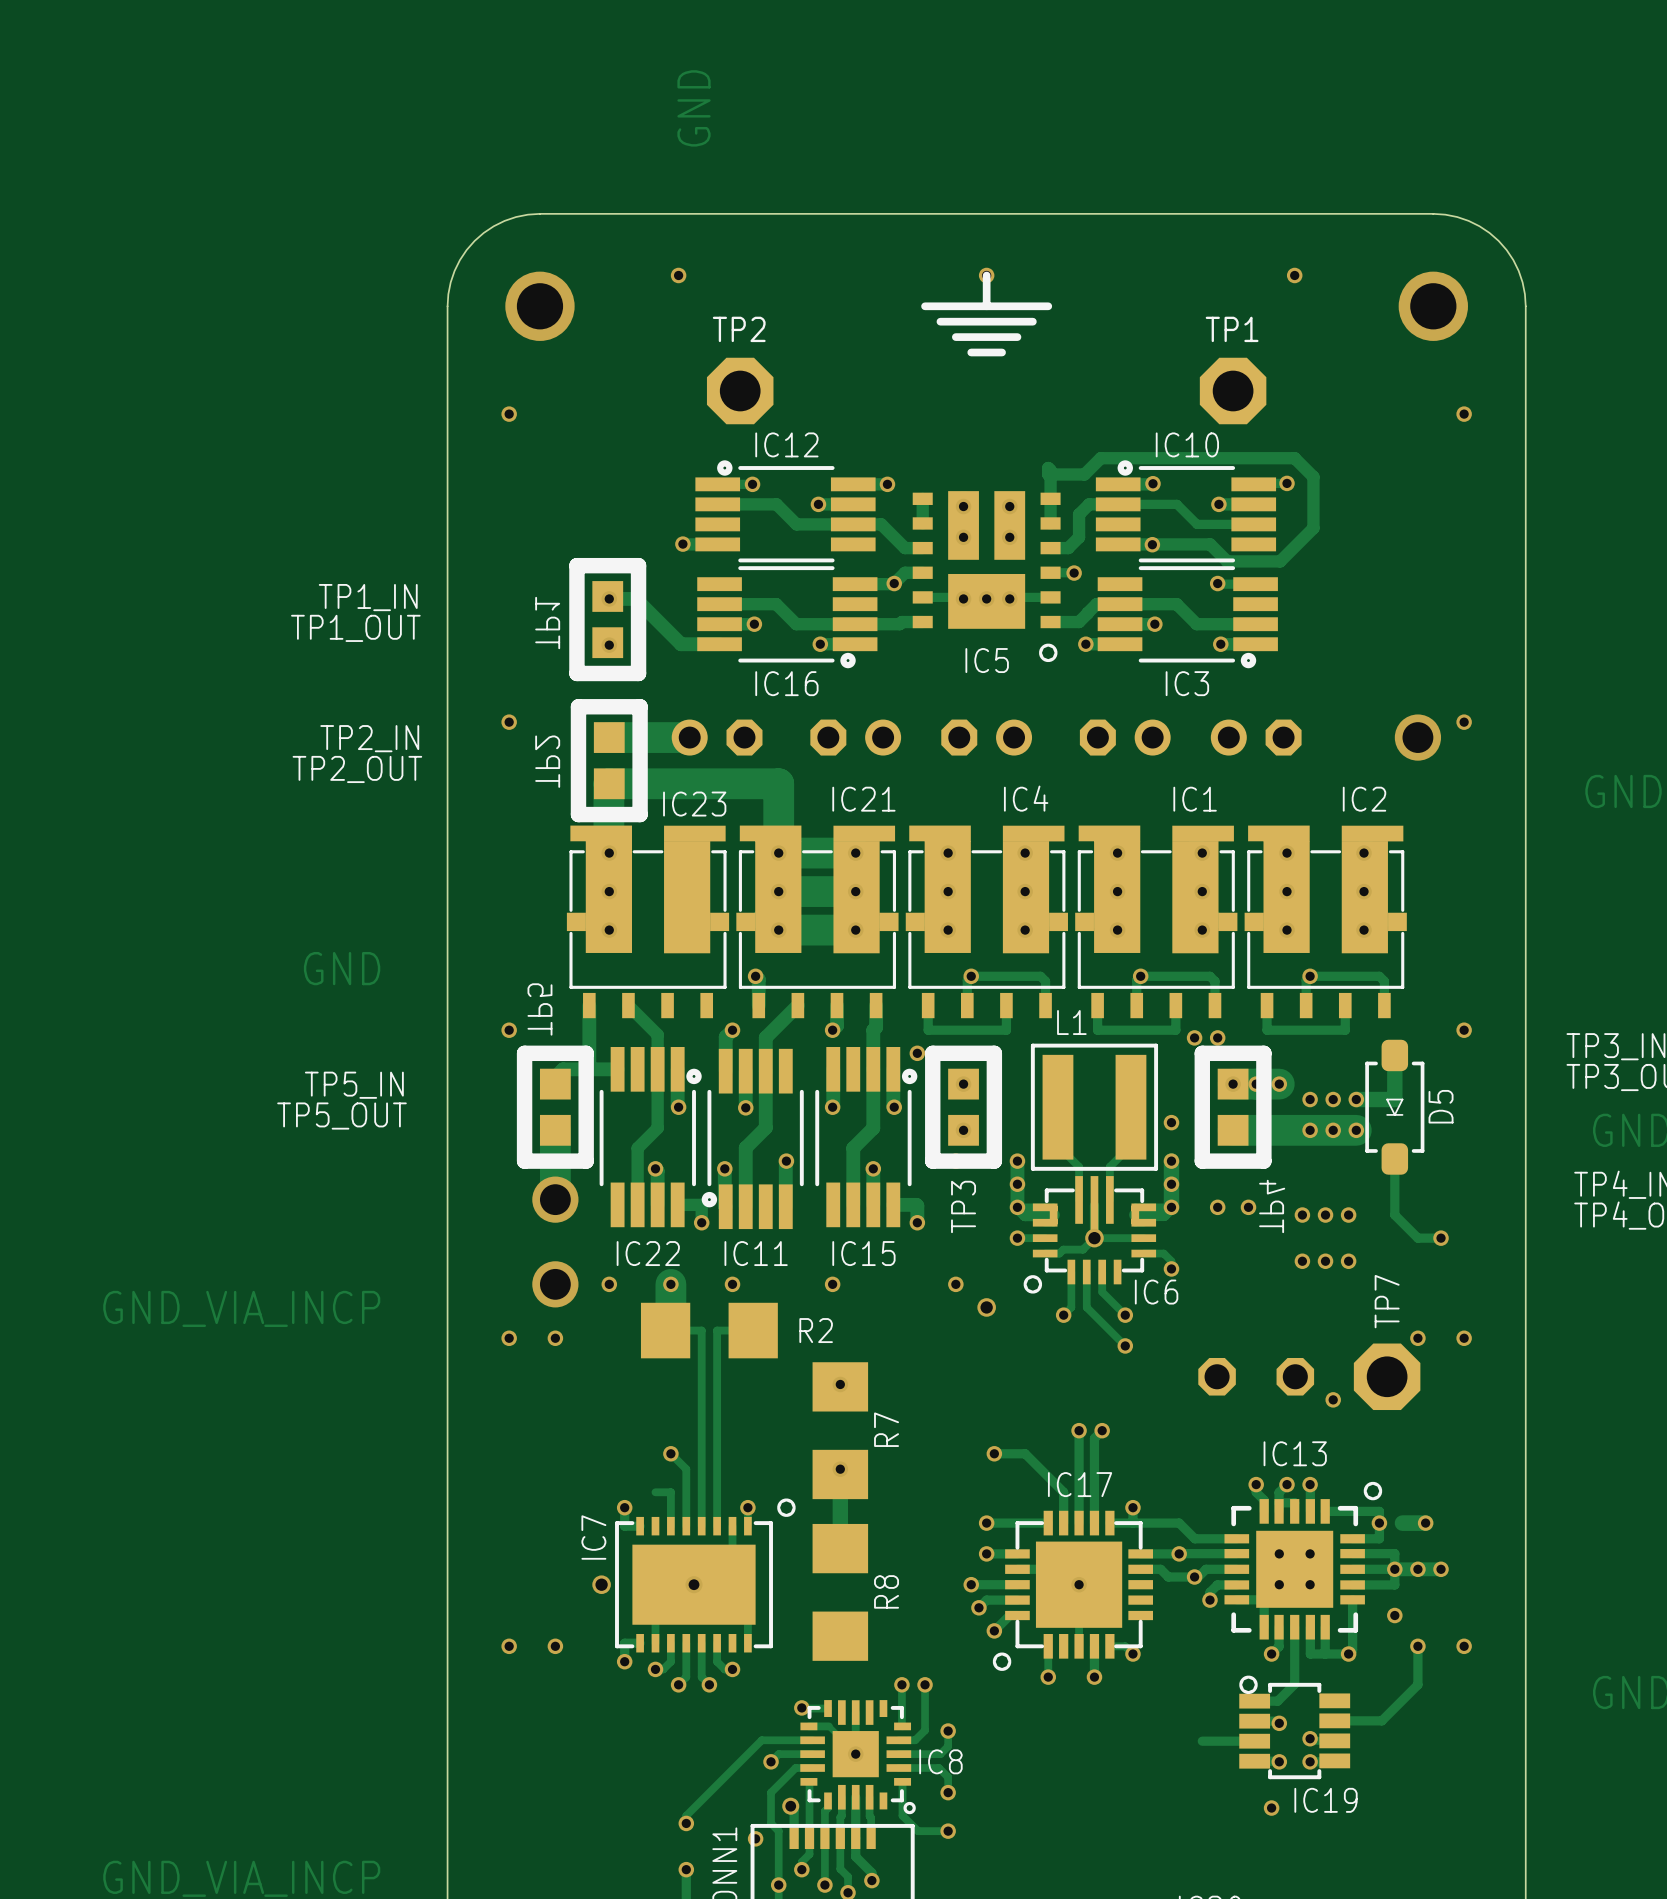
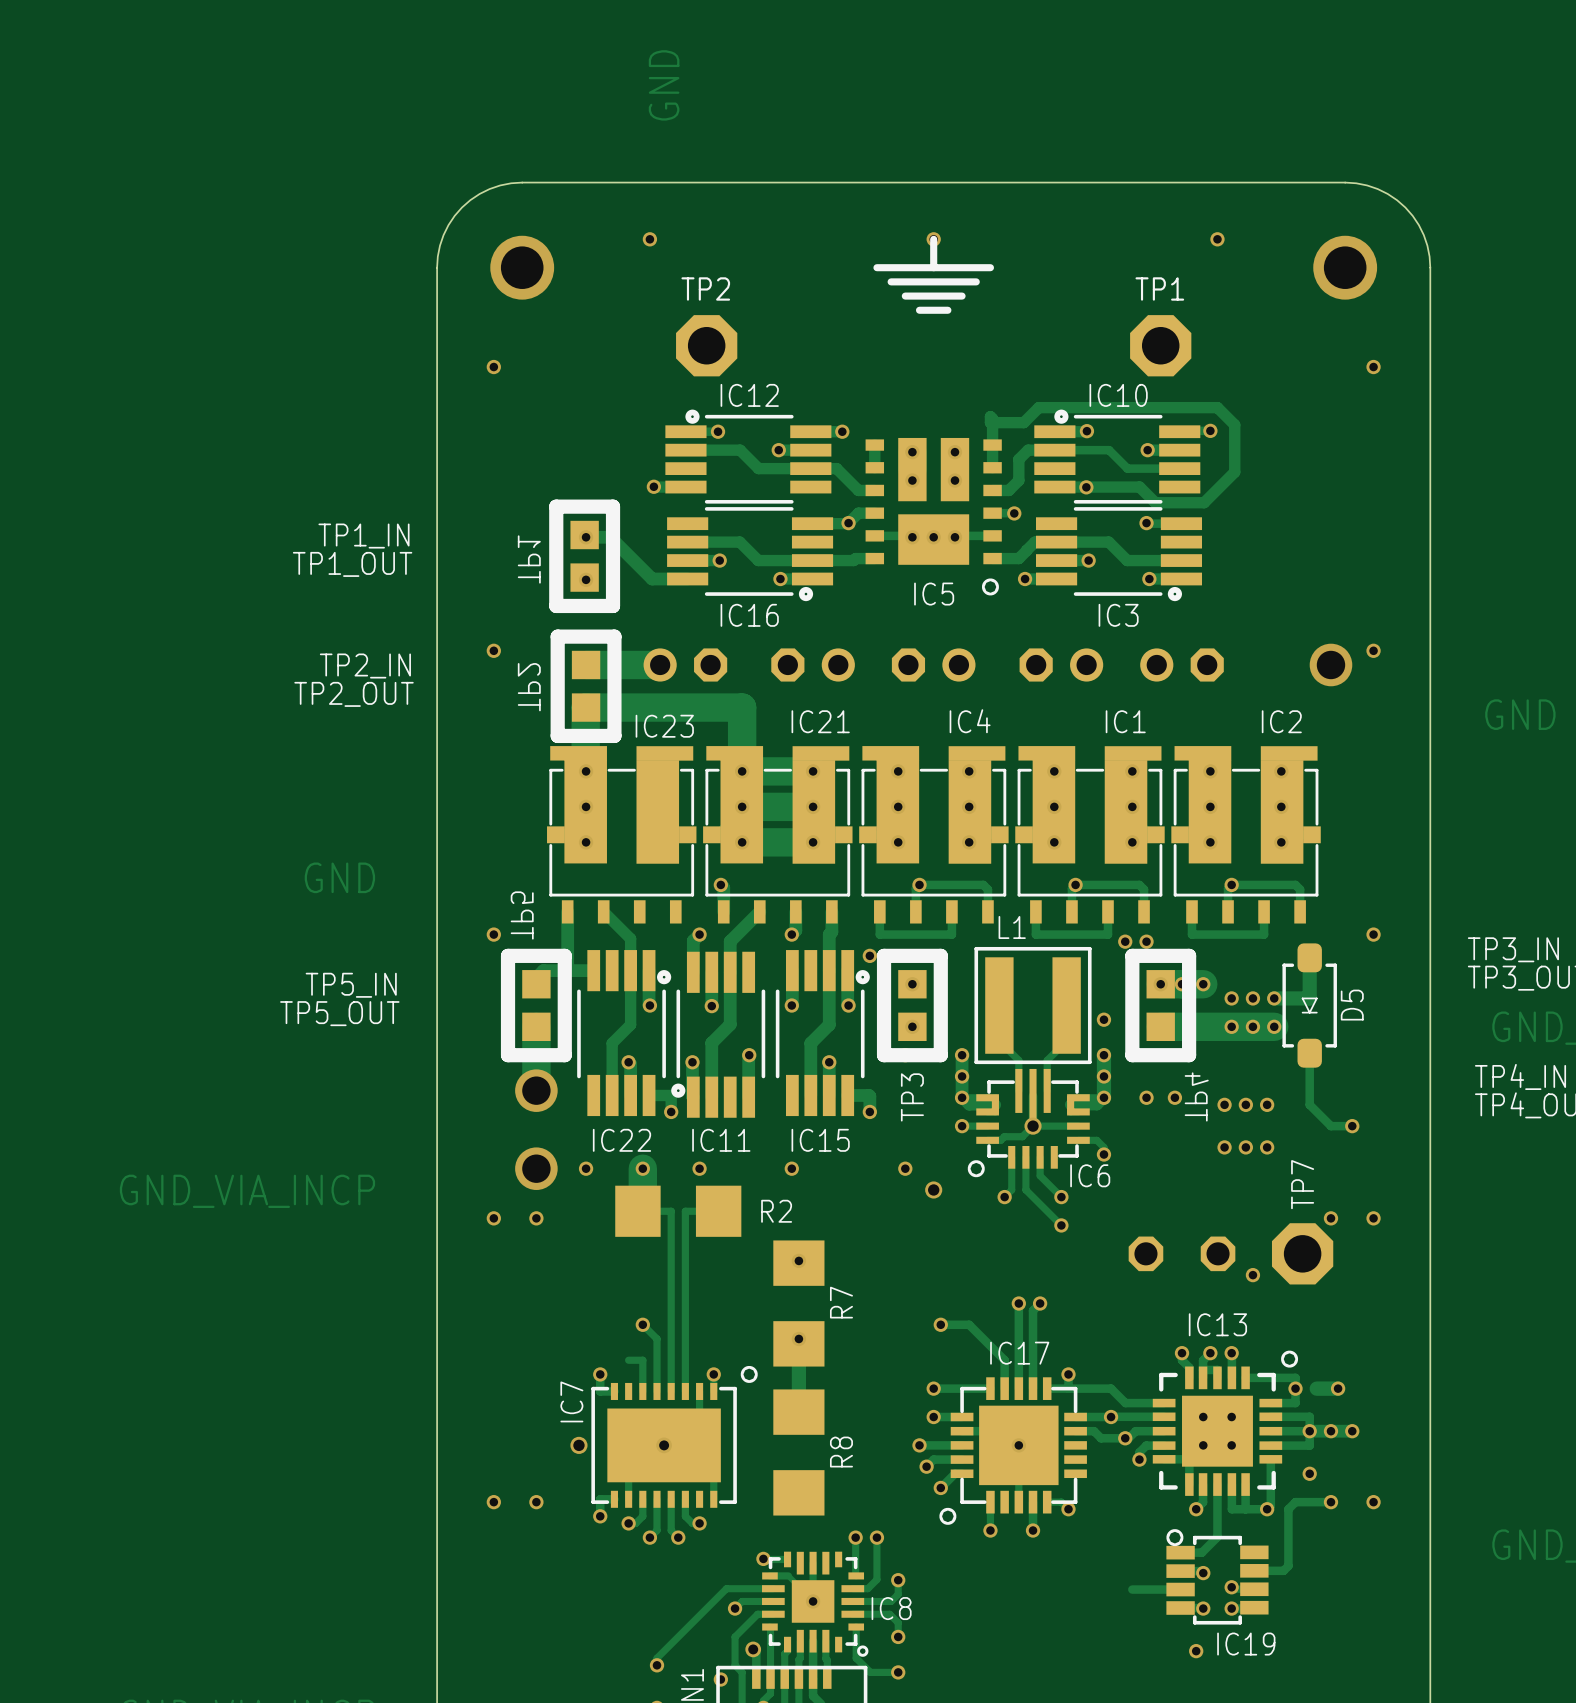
track: (1417, 1646) (1417, 1684) (1381, 1720) (1366, 1720) -> (1330, 1502) (1295, 1502) (1288, 1509) (1288, 1565) (1283, 1570)

